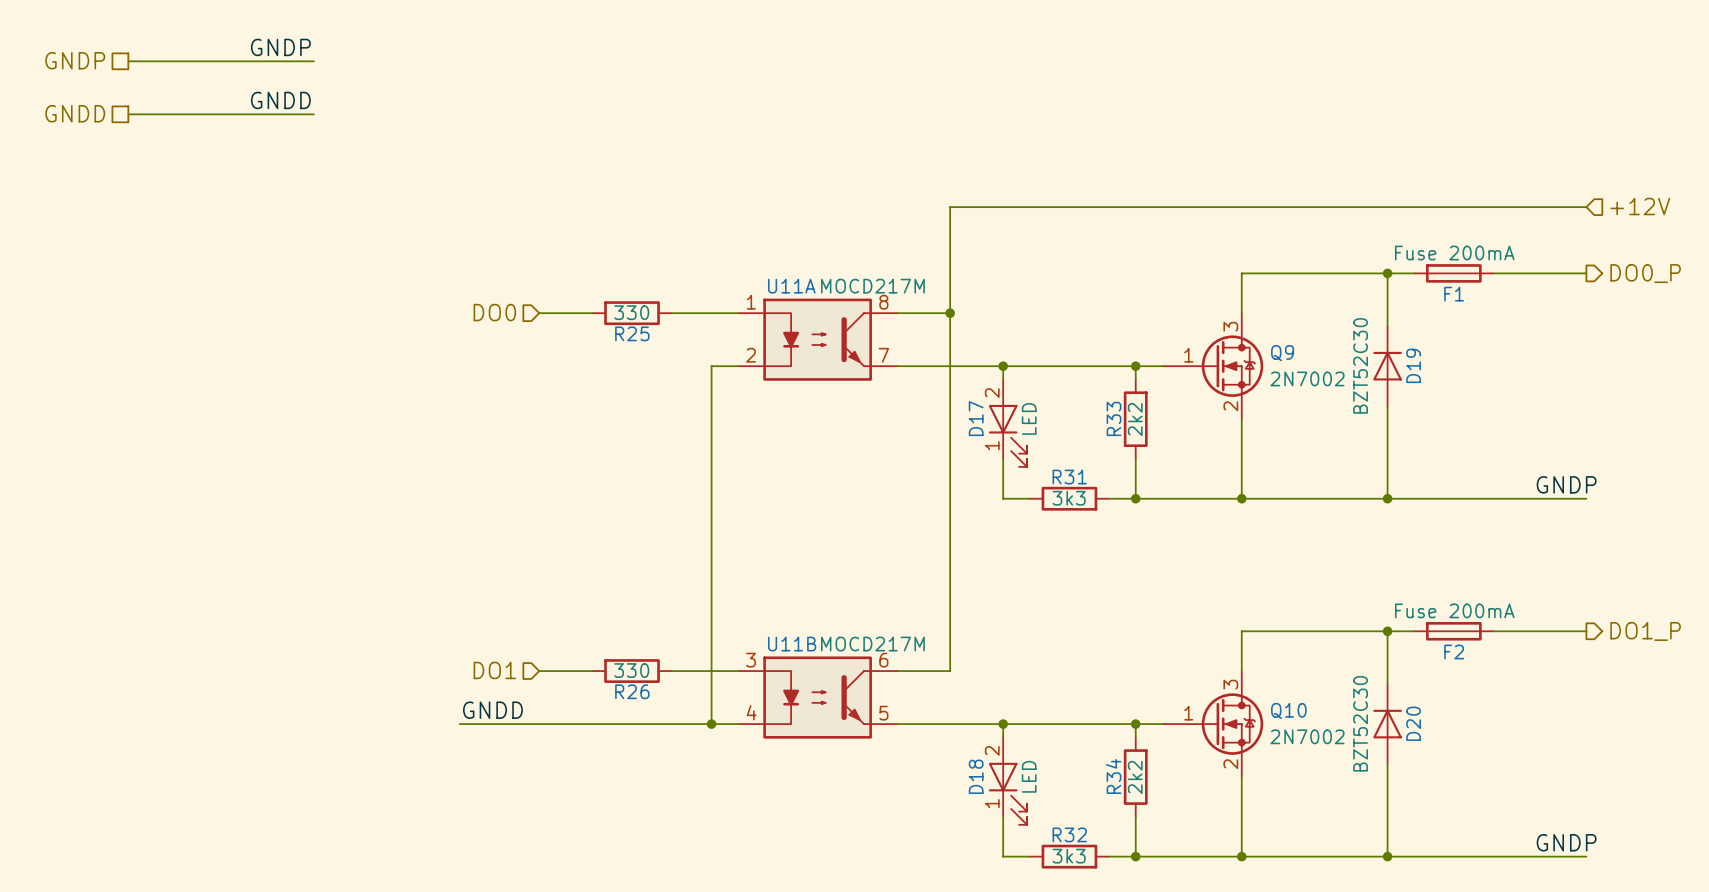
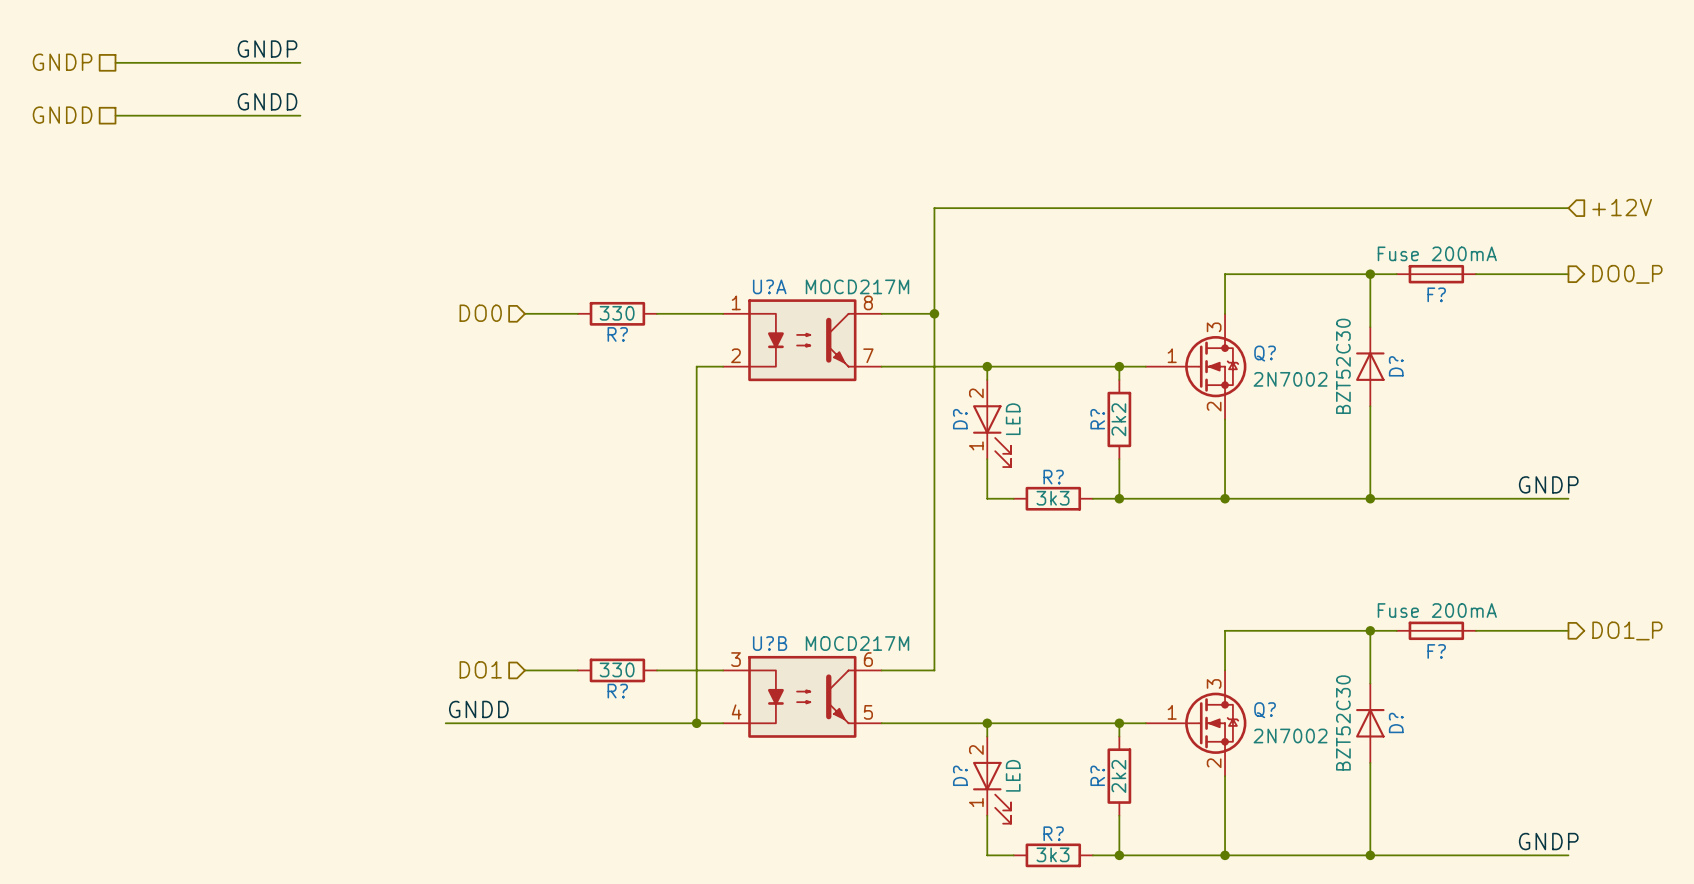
U11A name: U11A (791, 286) -> U?A (769, 286)
F1 name: F1 (1454, 294) -> F? (1436, 294)
R25 name: R25 (632, 333) -> R? (617, 334)
Q9 name: Q9 (1282, 353) -> Q? (1265, 353)
D19 name: D19 (1413, 365) -> D? (1396, 366)
D17 name: D17 (976, 418) -> D? (960, 419)
R33 name: R33 (1114, 418) -> R? (1097, 419)
R31 name: R31 (1069, 477) -> R? (1053, 477)
U11B name: U11B (792, 644) -> U?B (770, 643)
F2 name: F2 (1454, 652) -> F? (1436, 651)
R26 name: R26 (632, 691) -> R? (617, 691)
Q10 name: Q10 (1288, 710) -> Q? (1265, 710)
D20 name: D20 (1413, 723) -> D? (1396, 722)
D18 name: D18 (976, 776) -> D? (960, 775)
R34 name: R34 (1113, 776) -> R? (1097, 775)
R32 name: R32 (1069, 834) -> R? (1053, 833)

